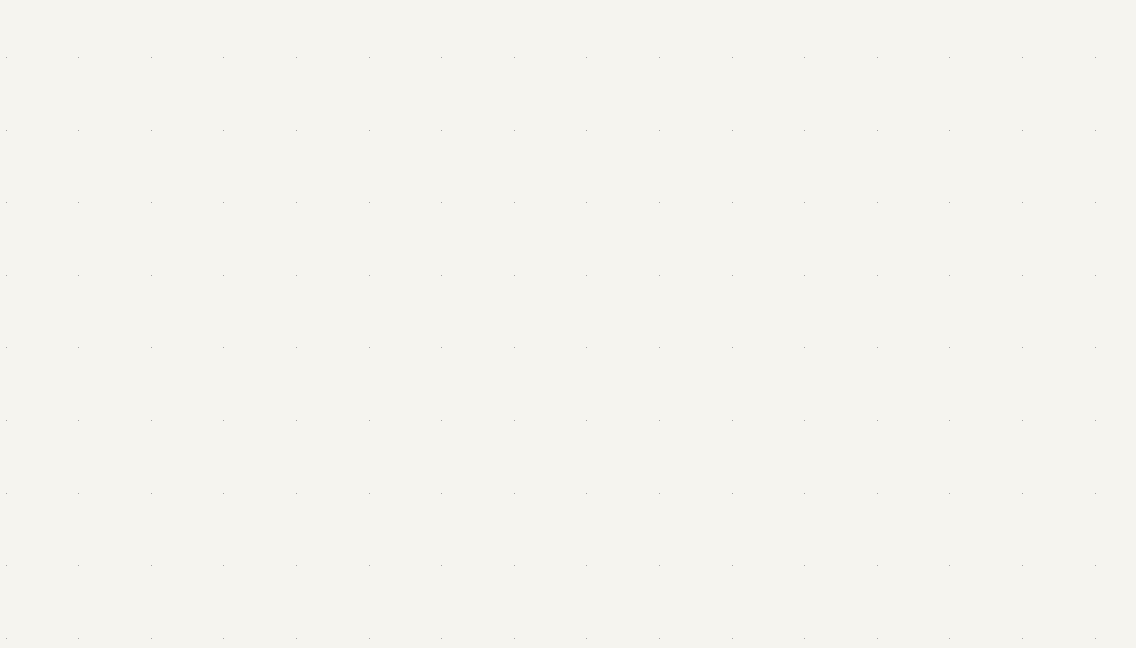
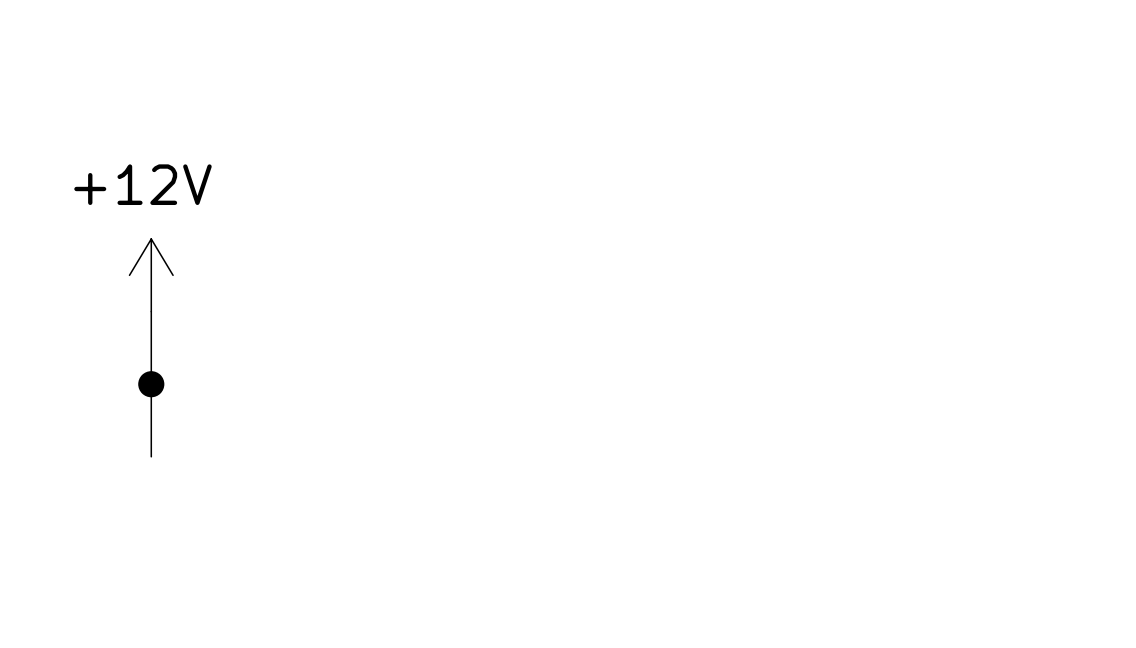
power symbol: none -> +12V (151, 275)
wire: none -> (151, 311) (151, 456)
junction: none -> (151, 384)

